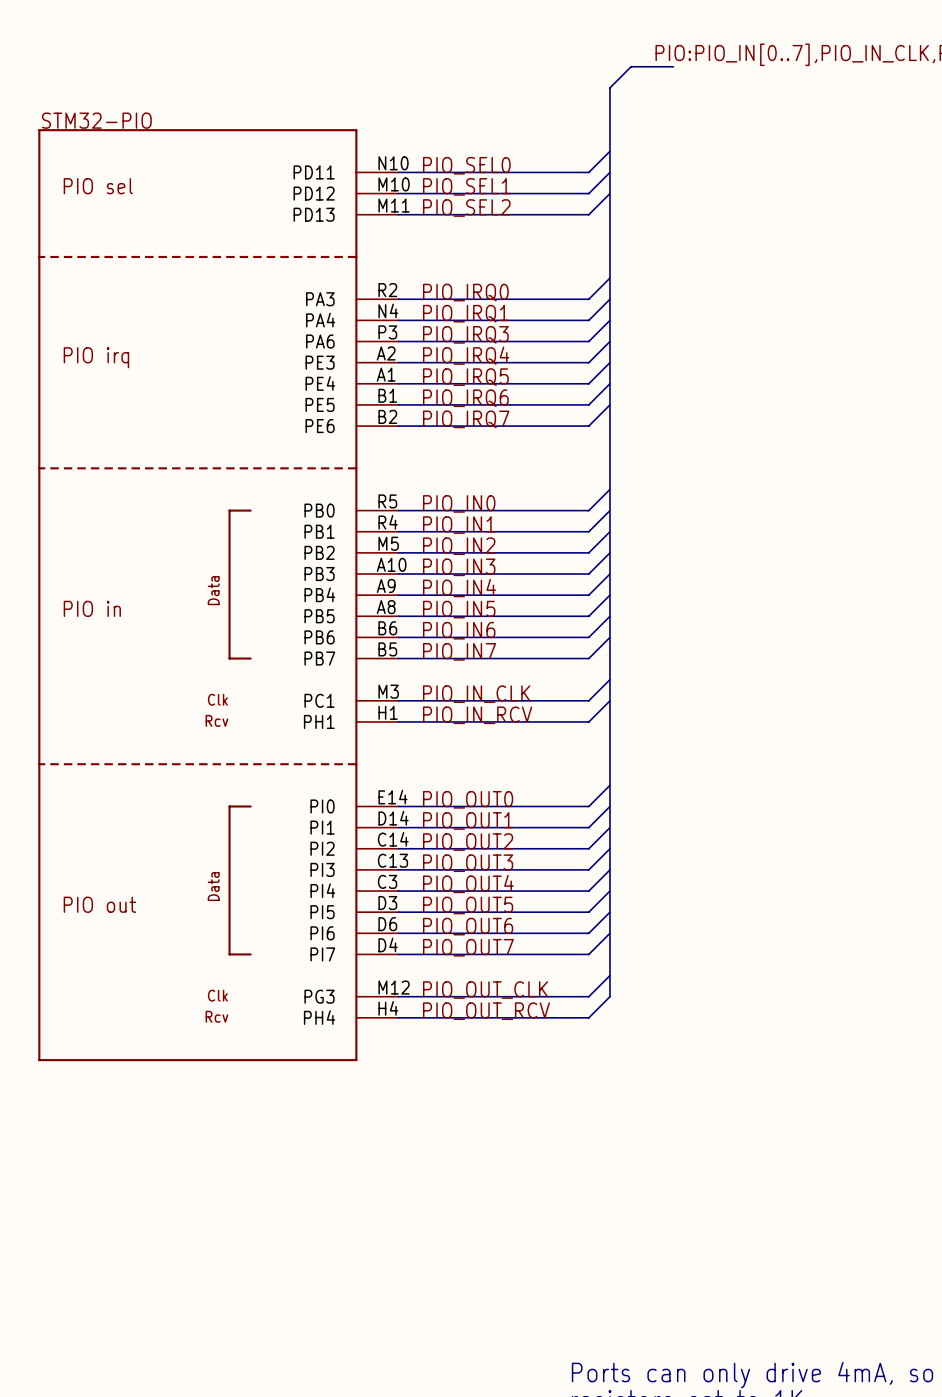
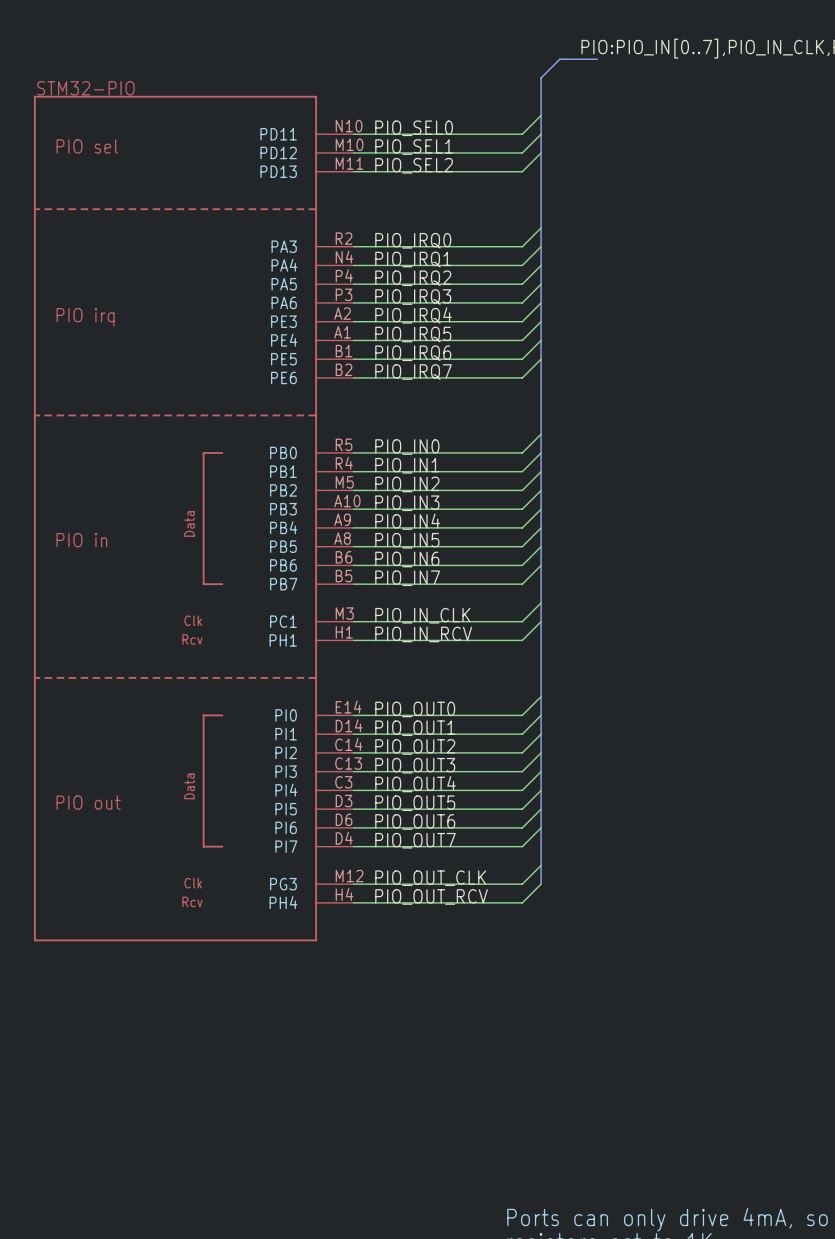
STM32-PIO symbol: [38, 129, 399, 1062] -> [33, 95, 354, 942]
label: none -> PIO_SEL0 (414, 128)
label: PIO_SEL0 (466, 165) -> PIO_SEL1 (414, 147)
label: PIO_SEL1 (466, 186) -> PIO_SEL2 (414, 165)
wire: (609, 193) (588, 214) (398, 214) -> (541, 115) (522, 134) (353, 134)
label: PIO_SEL2 (466, 208) -> none
wire: none -> (541, 227) (522, 246) (353, 246)
label: none -> PIO_IRQ0 (413, 240)
label: PIO_IRQ0 (465, 292) -> PIO_IRQ1 (413, 259)
label: PIO_IRQ1 (465, 313) -> PIO_IRQ2 (413, 278)

